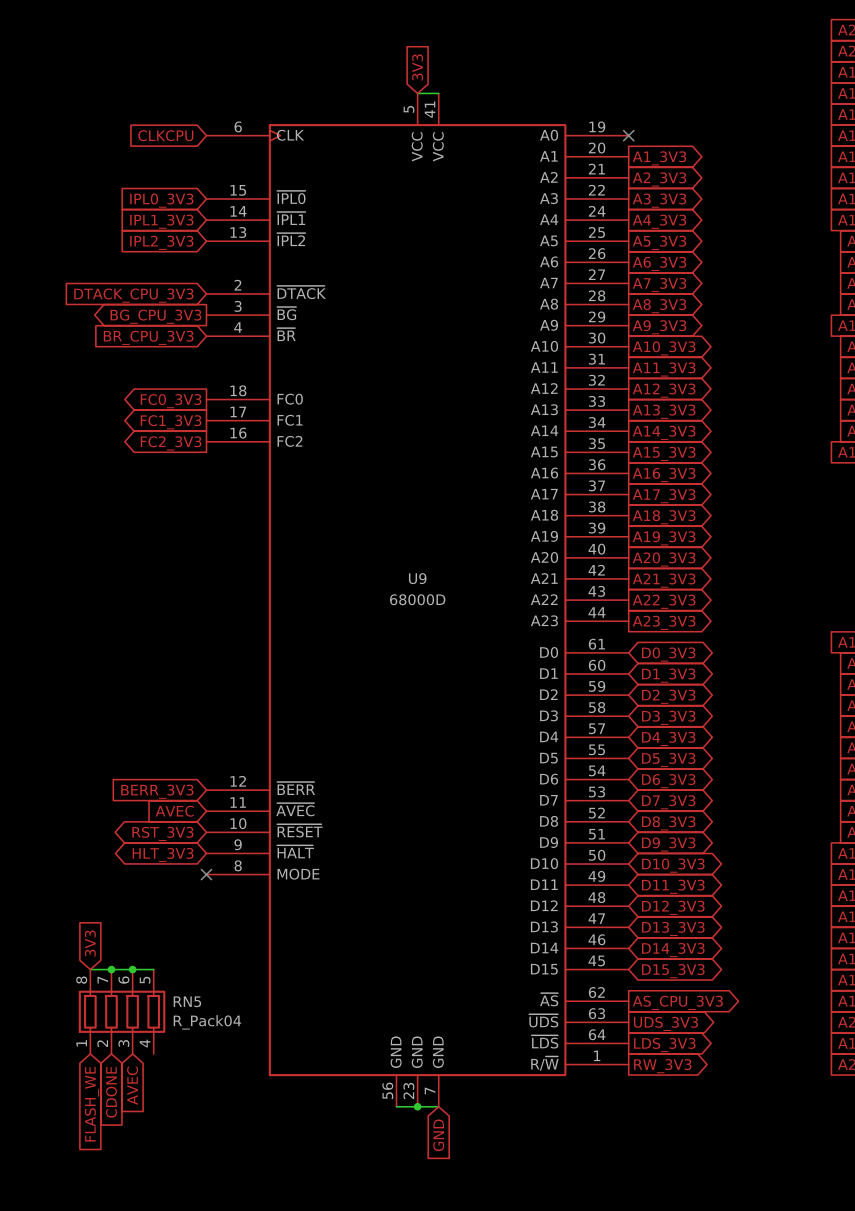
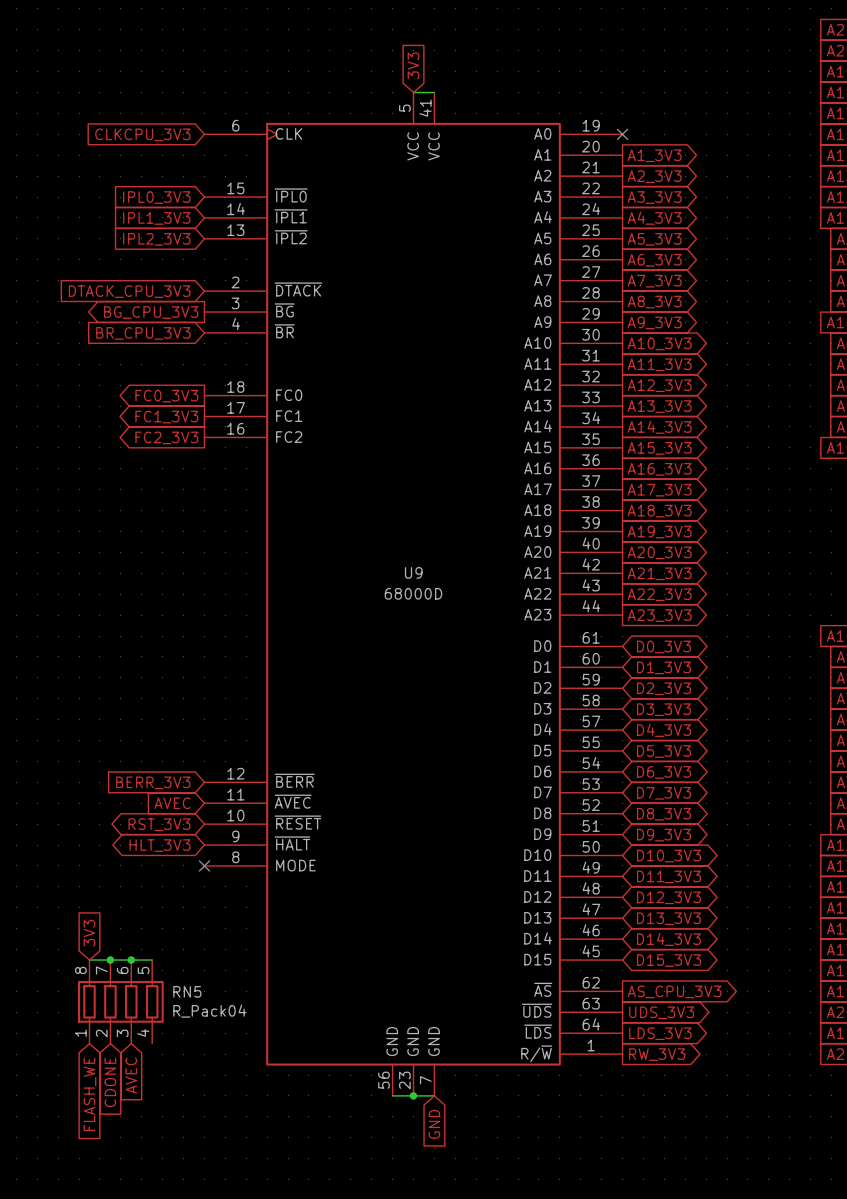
global label: CLKCPU (165, 135) -> CLKCPU_3V3 (142, 134)

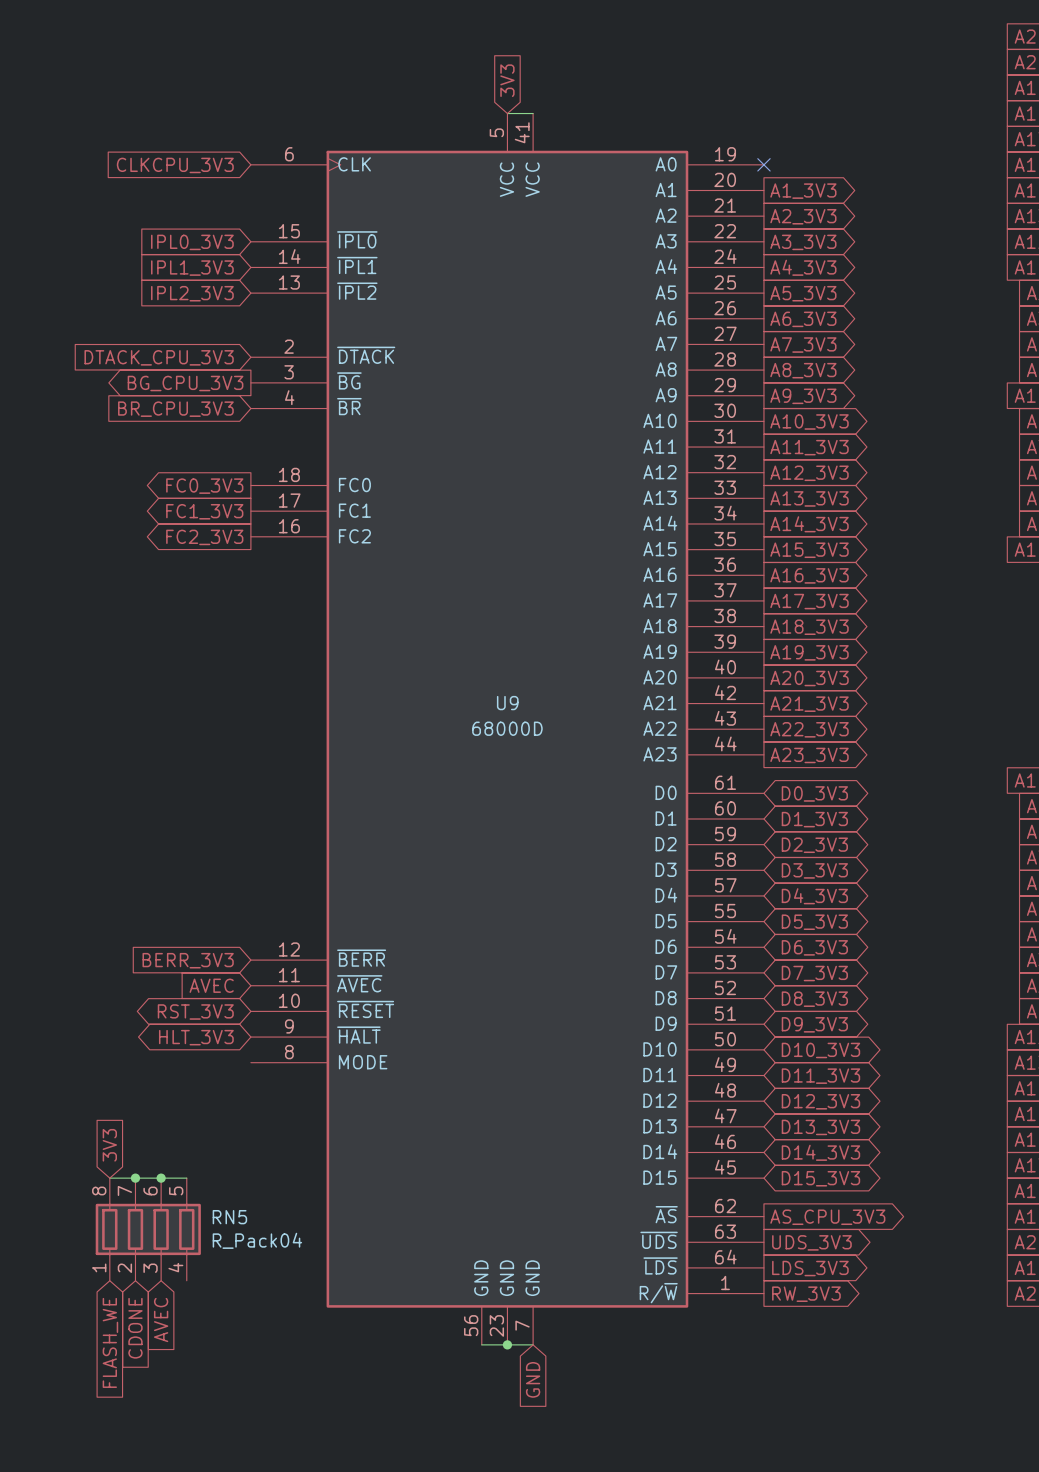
no-connect mark: (204, 865) -> none

